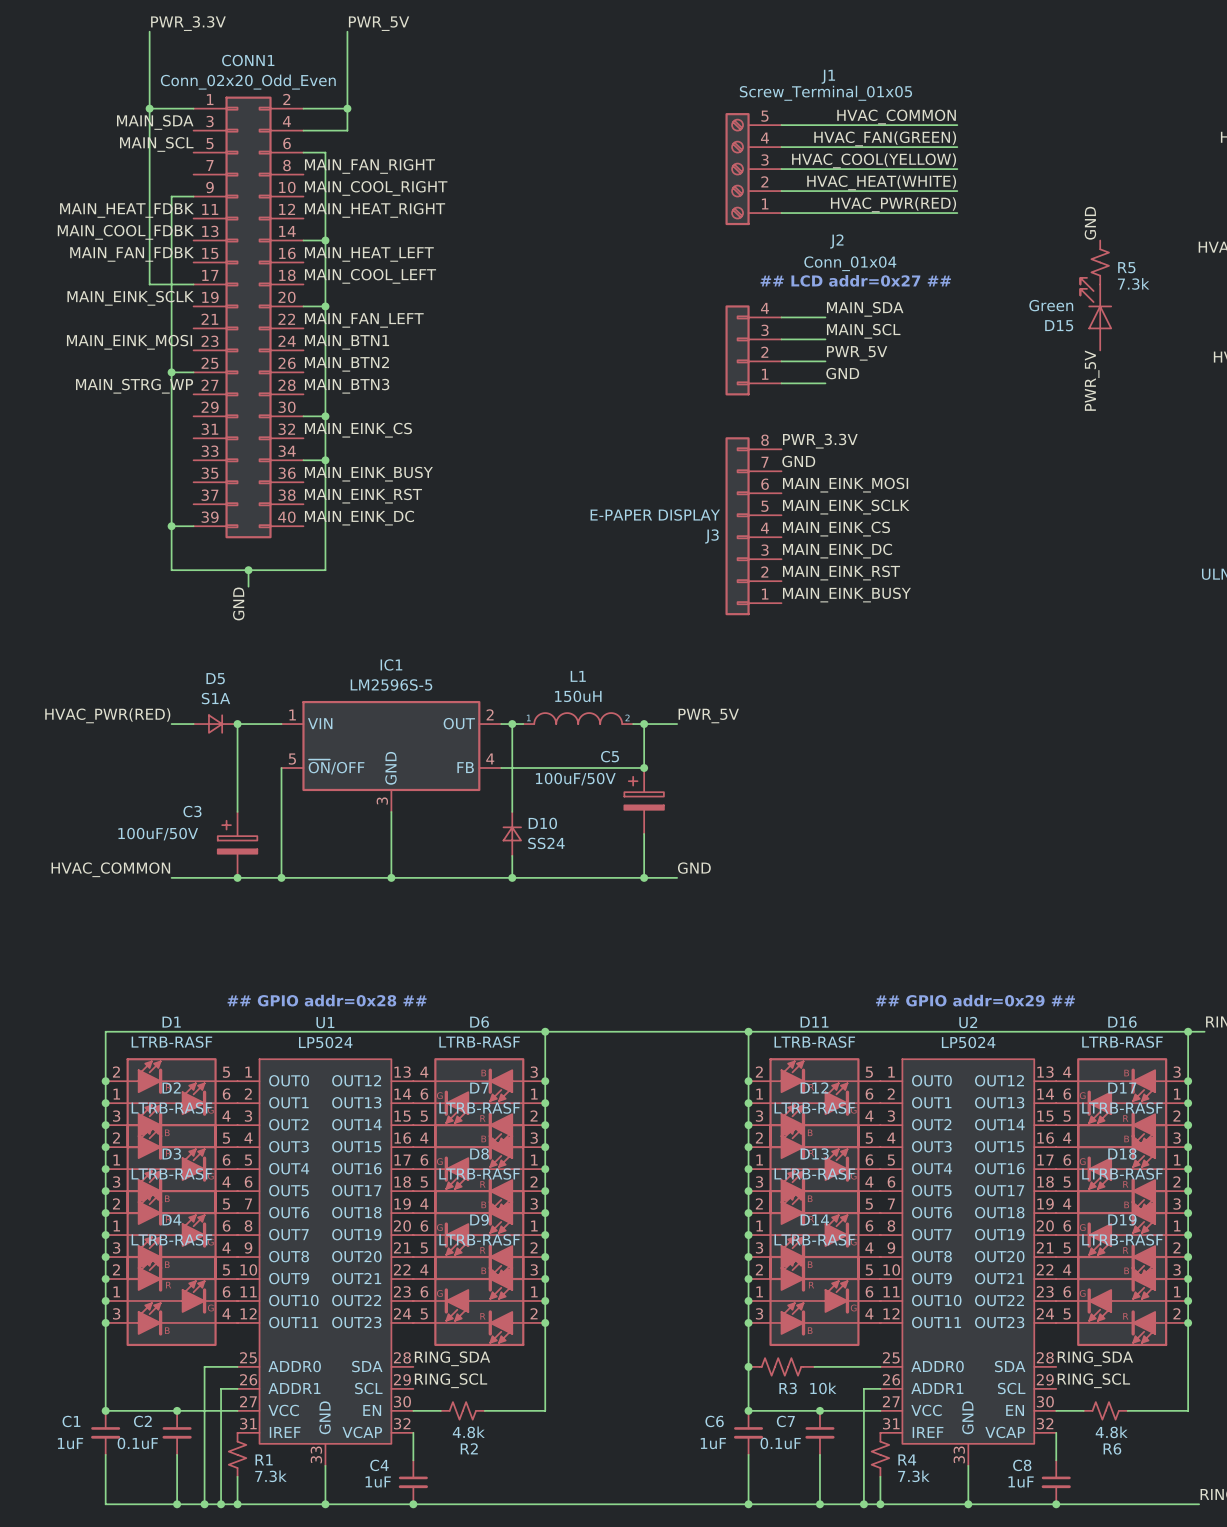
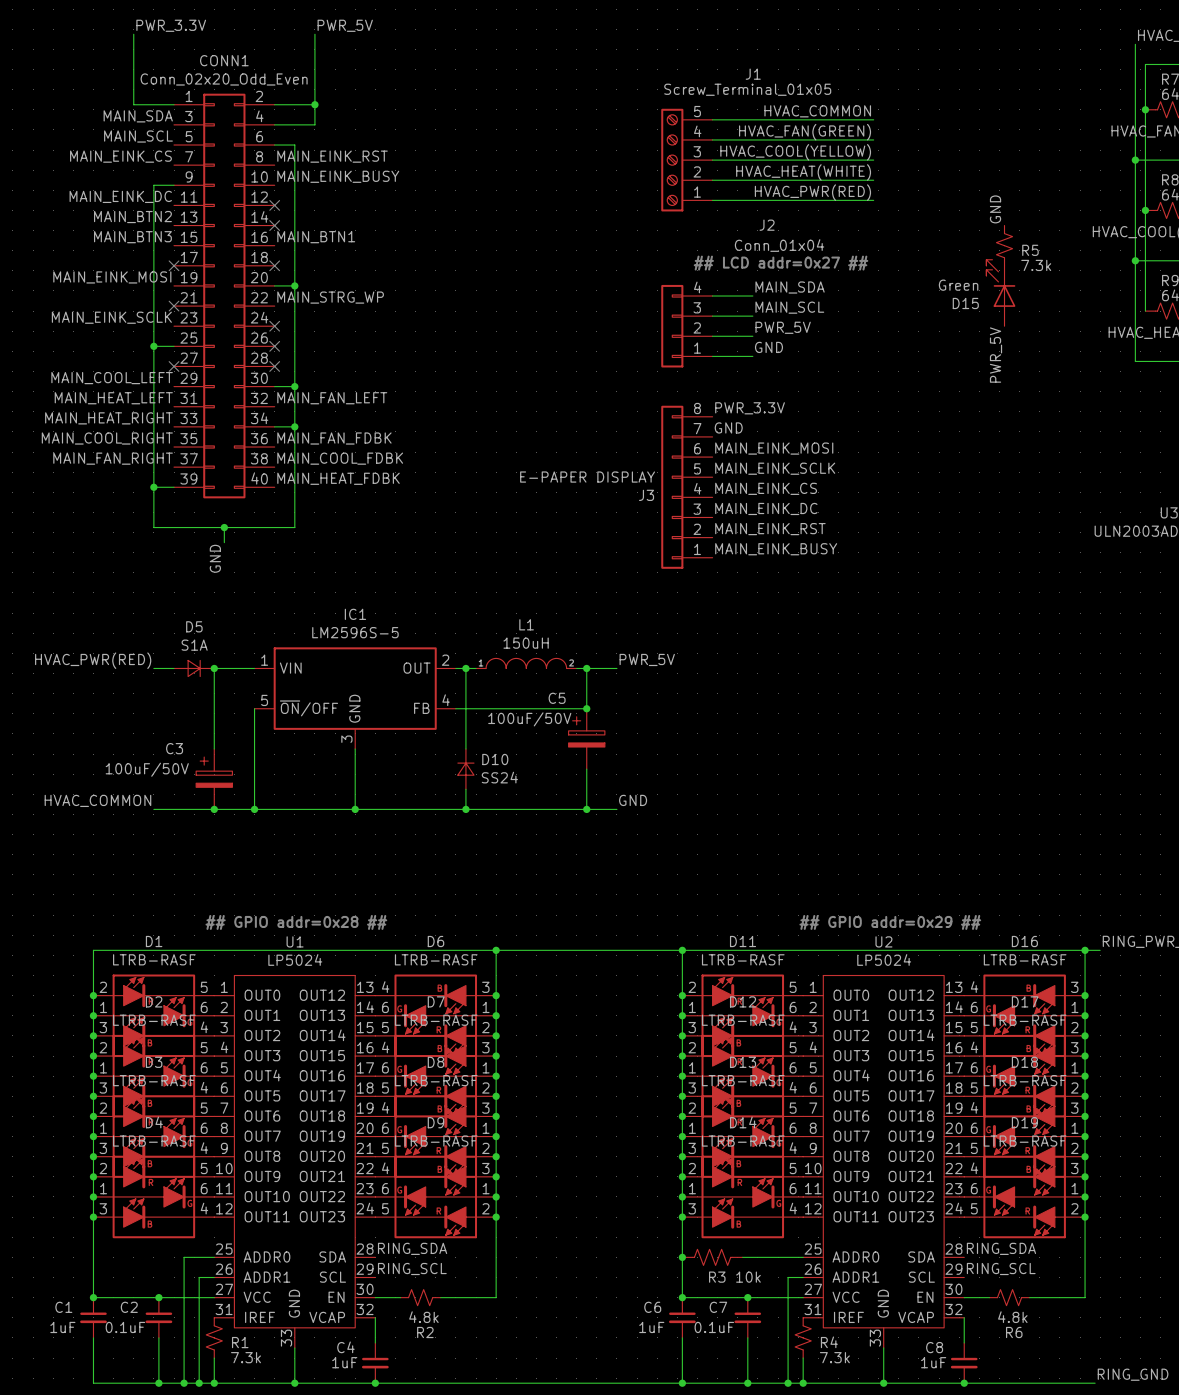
wire: (149, 108) (149, 284) (193, 284) -> none
junction: (149, 108) -> none
label: none -> MAIN_EINK_CS (120, 156)
label: MAIN_FAN_RIGHT (369, 166) -> MAIN_EINK_RST (332, 156)
label: MAIN_COOL_RIGHT (376, 188) -> MAIN_EINK_BUSY (338, 176)
label: MAIN_HEAT_FDBK (126, 210) -> MAIN_EINK_DC (120, 196)
label: MAIN_HEAT_RIGHT (375, 210) -> none
no-connect mark: none -> (274, 205)
label: MAIN_COOL_FDBK (125, 232) -> MAIN_BTN2 (132, 217)
wire: (303, 240) (325, 240) -> none
no-connect mark: none -> (274, 225)
junction: (325, 240) -> none
label: MAIN_FAN_FDBK (132, 254) -> MAIN_BTN3 (132, 237)
label: MAIN_HEAT_LEFT (369, 254) -> MAIN_BTN1 (316, 237)
label position: MAIN_COOL_LEFT (370, 276) -> MAIN_COOL_LEFT (112, 378)
no-connect mark: none -> (174, 265)
no-connect mark: none -> (274, 265)
label: MAIN_EINK_SCLK (130, 298) -> MAIN_EINK_MOSI (112, 277)
label: MAIN_FAN_LEFT (364, 320) -> MAIN_STRG_WP (330, 297)
no-connect mark: none -> (174, 306)
label: MAIN_EINK_MOSI (129, 342) -> MAIN_EINK_SCLK (111, 317)
label: MAIN_BTN1 (347, 342) -> none
no-connect mark: none -> (274, 326)
label: MAIN_BTN2 (346, 364) -> none
no-connect mark: none -> (274, 346)
label: MAIN_STRG_WP (134, 386) -> none
label: MAIN_BTN3 (347, 386) -> none
no-connect mark: none -> (174, 366)
no-connect mark: none -> (274, 366)
label: none -> MAIN_HEAT_LEFT (113, 398)
label: MAIN_EINK_CS (358, 430) -> MAIN_FAN_LEFT (332, 398)
label: none -> MAIN_HEAT_RIGHT (108, 418)
label: none -> MAIN_COOL_RIGHT (107, 438)
label: MAIN_EINK_BUSY (368, 474) -> MAIN_FAN_FDBK (334, 438)
label: none -> MAIN_FAN_RIGHT (113, 458)
label: MAIN_EINK_RST (363, 496) -> MAIN_COOL_FDBK (340, 458)
label: MAIN_EINK_DC (359, 518) -> MAIN_HEAT_FDBK (338, 478)

